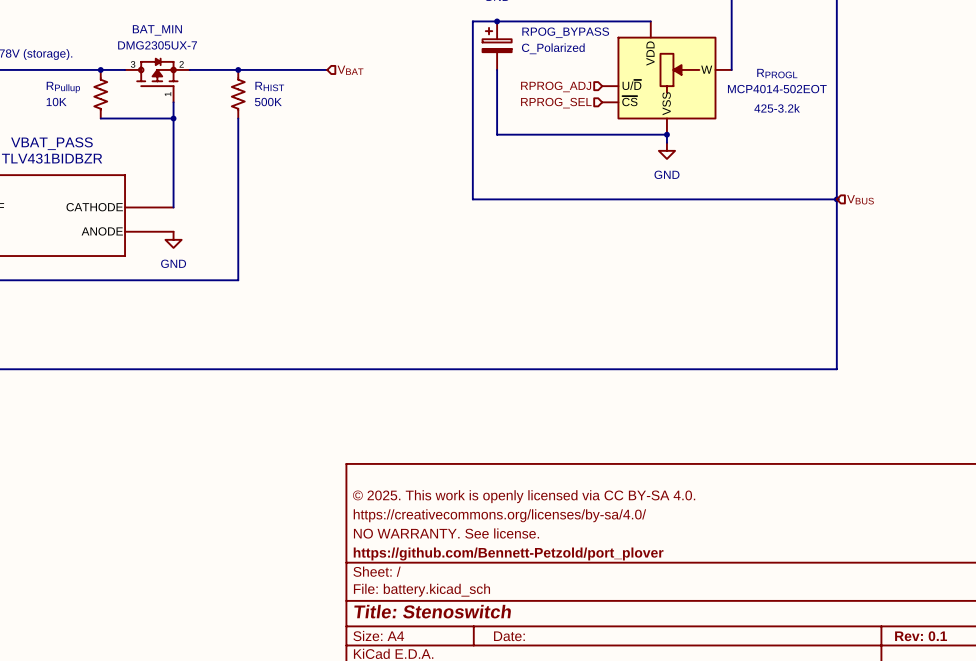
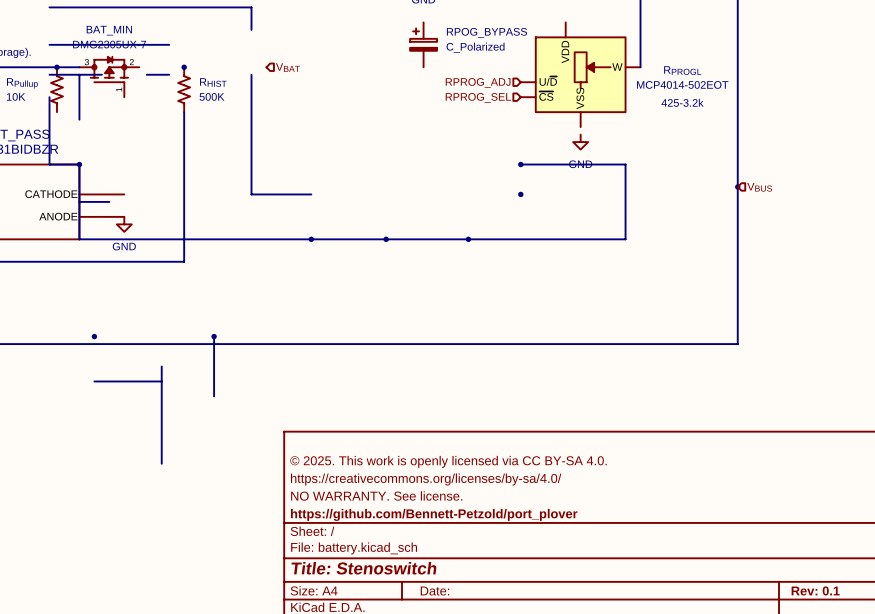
wire: none -> (49, 7) (251, 7) (251, 29)
junction: (497, 21) -> none
wire: (650, 21) (472, 21) (472, 199) (836, 199) -> none
wire: none -> (49, 44) (169, 44)
wire: (189, 69) (327, 69) -> none
wire: (497, 69) (497, 134) (666, 134) (666, 142) -> none
wire: none -> (49, 74) (101, 74)
wire: none -> (79, 74) (79, 119)
wire: none -> (146, 74) (169, 74)
wire: none -> (251, 74) (251, 194) (311, 194)
wire: none -> (49, 97) (49, 164) (79, 164) (79, 239) (625, 239) (625, 164) (520, 164)
wire: (173, 102) (173, 207) -> none
wire: (100, 118) (173, 118) -> none
junction: (173, 118) -> none
junction: (666, 134) -> none
junction: none -> (79, 164)
junction: none -> (520, 164)
junction: none -> (520, 194)
wire: none -> (79, 201) (109, 201)
junction: none -> (311, 239)
junction: none -> (386, 239)
junction: none -> (468, 239)
junction: none -> (94, 336)
wire: none -> (214, 336) (214, 396)
junction: none -> (214, 336)
wire: none -> (161, 366) (161, 463)
wire: none -> (94, 381) (161, 381)

